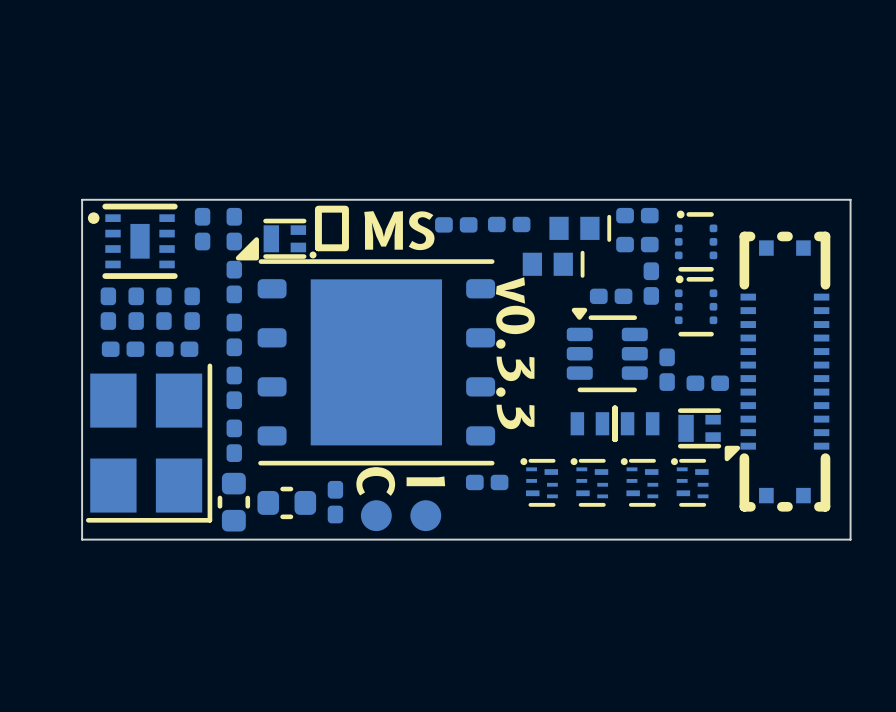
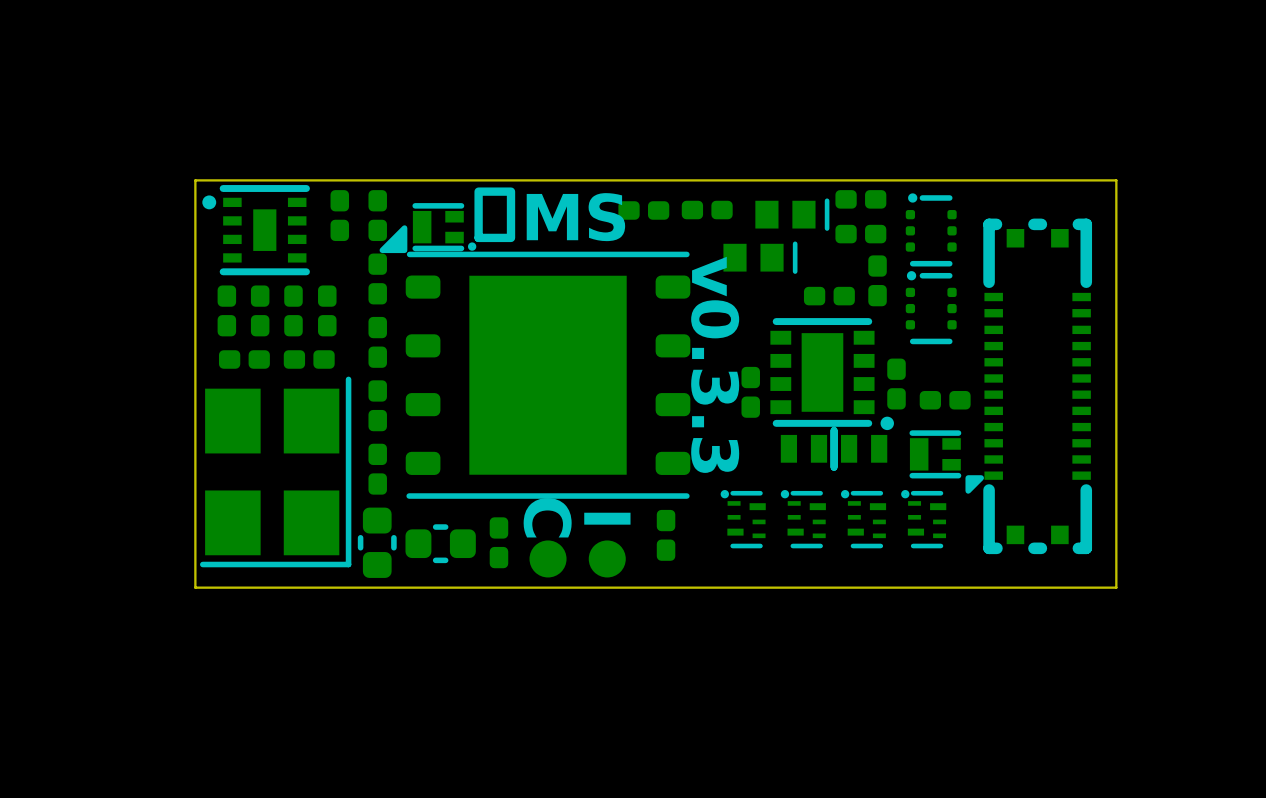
part footprint: [566, 307, 648, 393] -> [770, 318, 894, 431]
part: none -> (750, 392)
part rotation: 0° (487, 482) -> 90° clockwise (666, 535)

